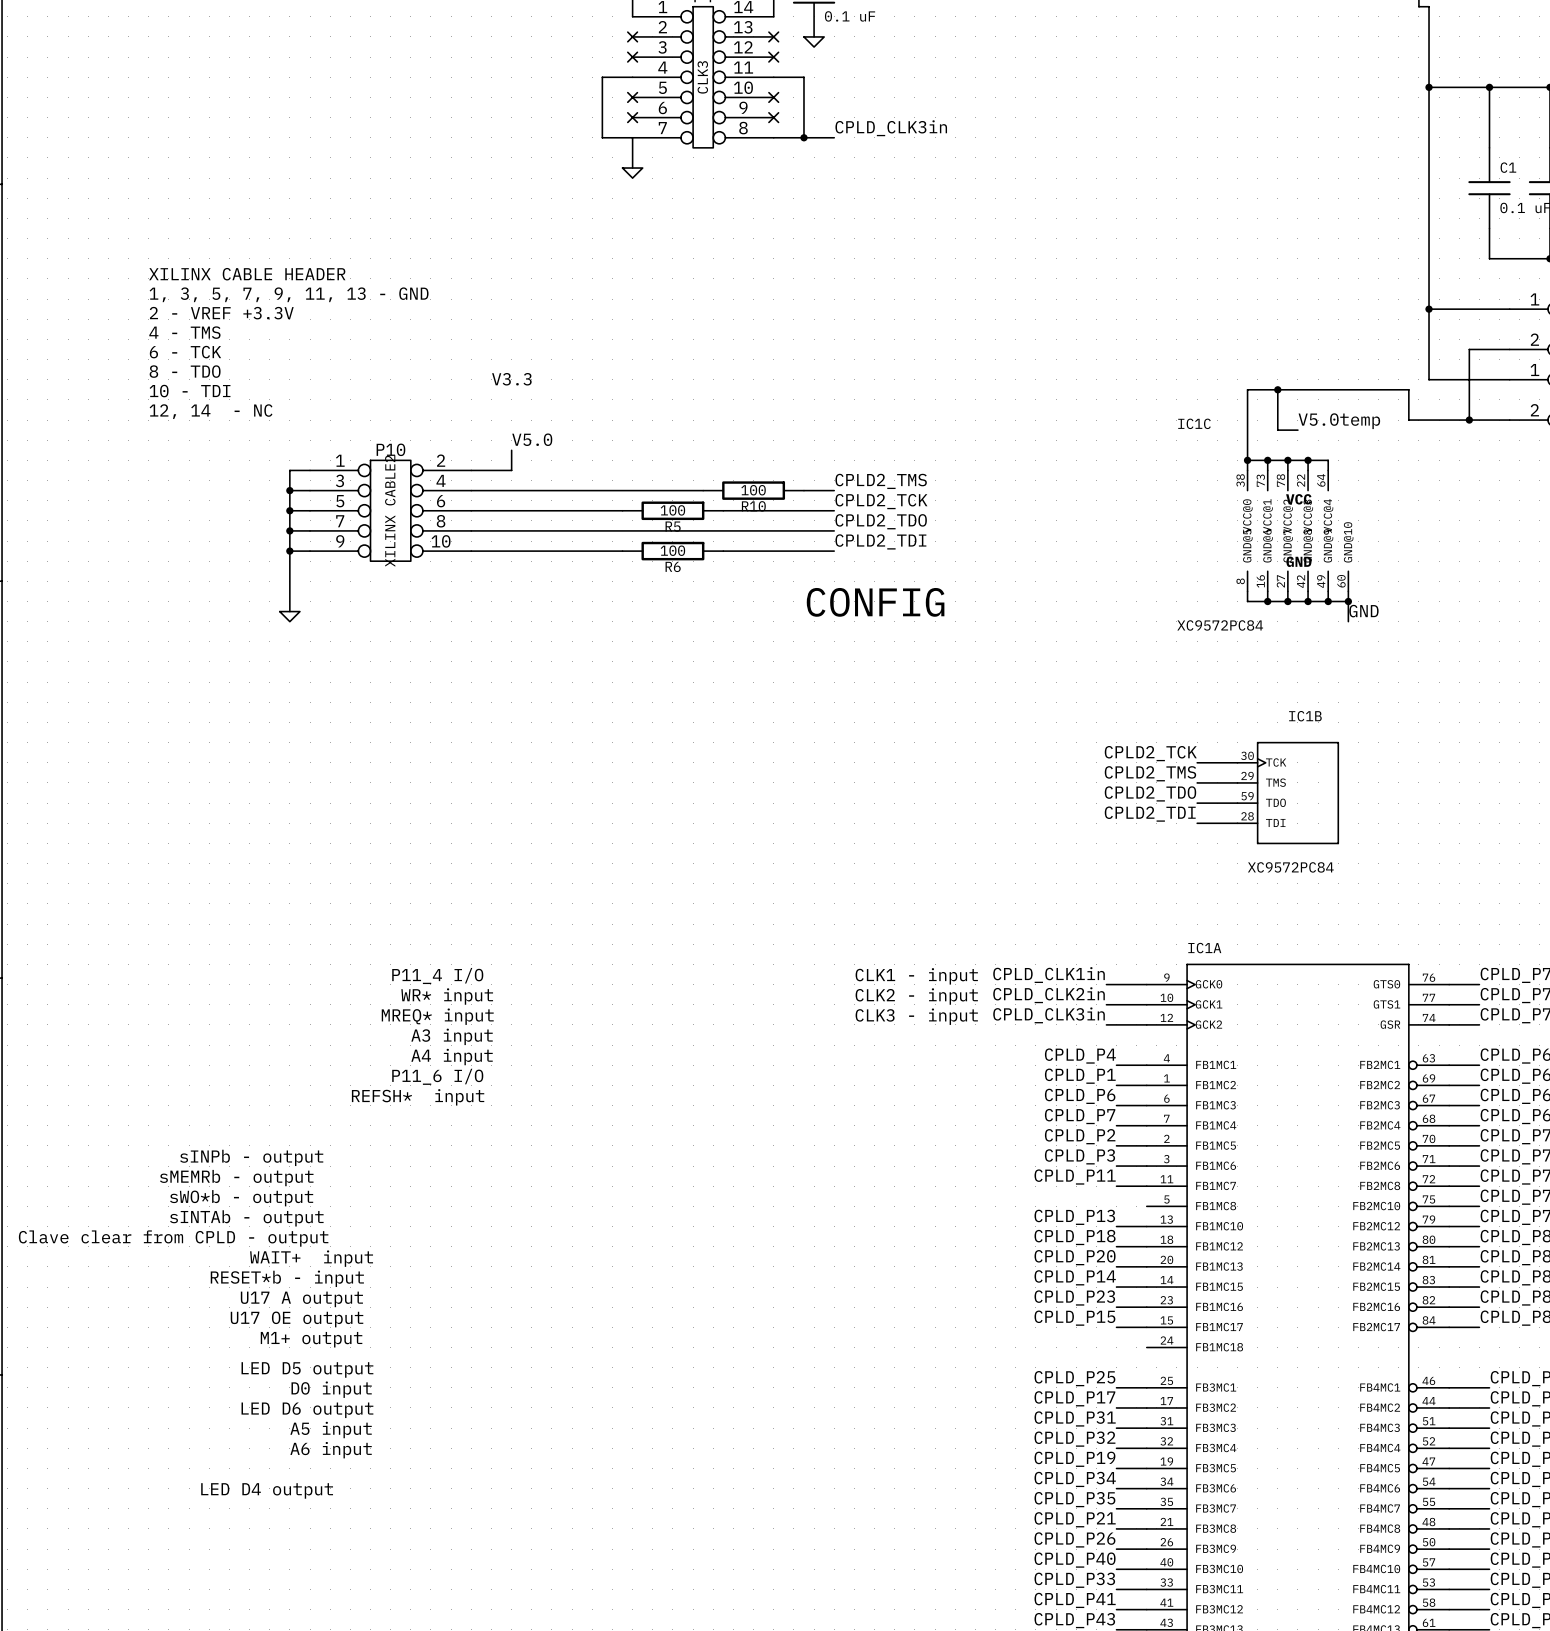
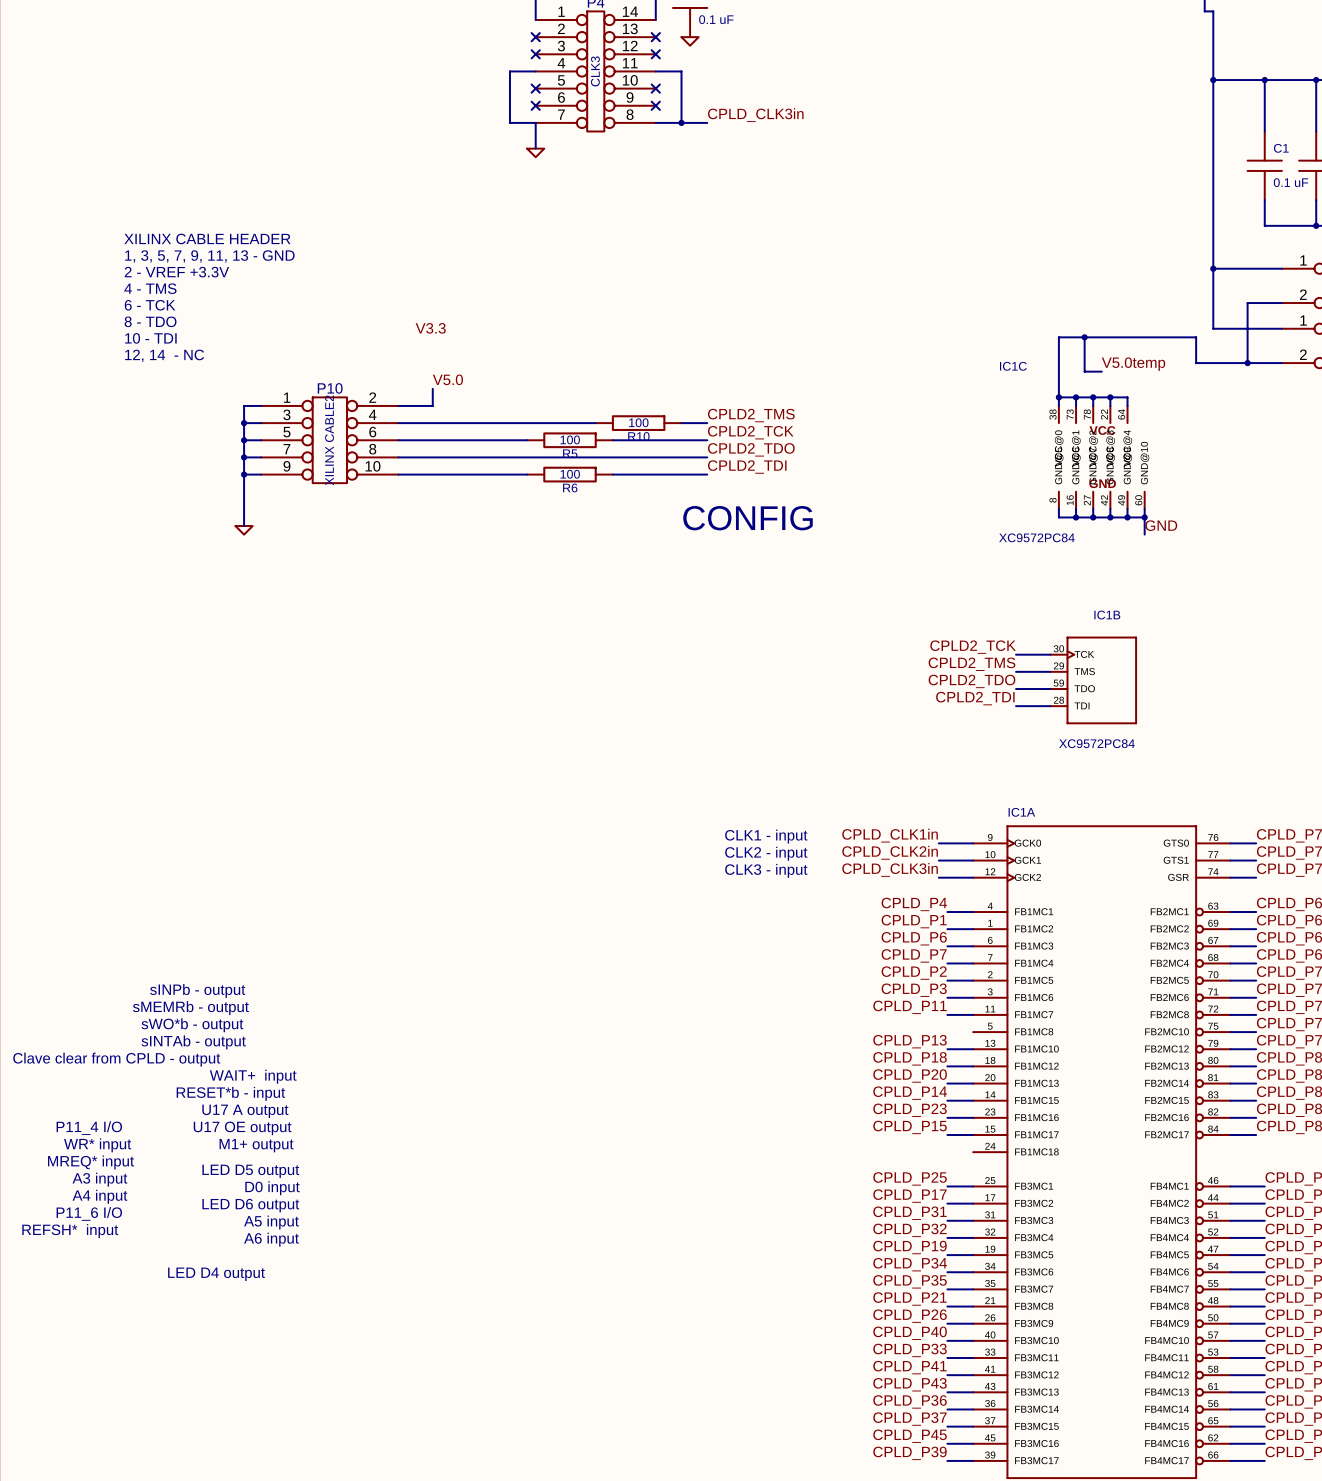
text: P11_4 I/O (437, 976) -> none
text: WR* input (447, 996) -> none
text: MREQ* input (437, 1016) -> none
text: A3 input (452, 1036) -> none
text: A4 input (452, 1057) -> none
text: P11_6 I/O (437, 1076) -> none
text: REFSH* input (418, 1097) -> none
text: none -> P11_4 I/O (89, 1128)
text: none -> WR* input (97, 1145)
text: none -> MREQ* input (91, 1162)
text: none -> A3 input (99, 1179)
text: none -> A4 input (99, 1196)
text: none -> P11_6 I/O (89, 1213)
text: none -> REFSH* input (70, 1231)

